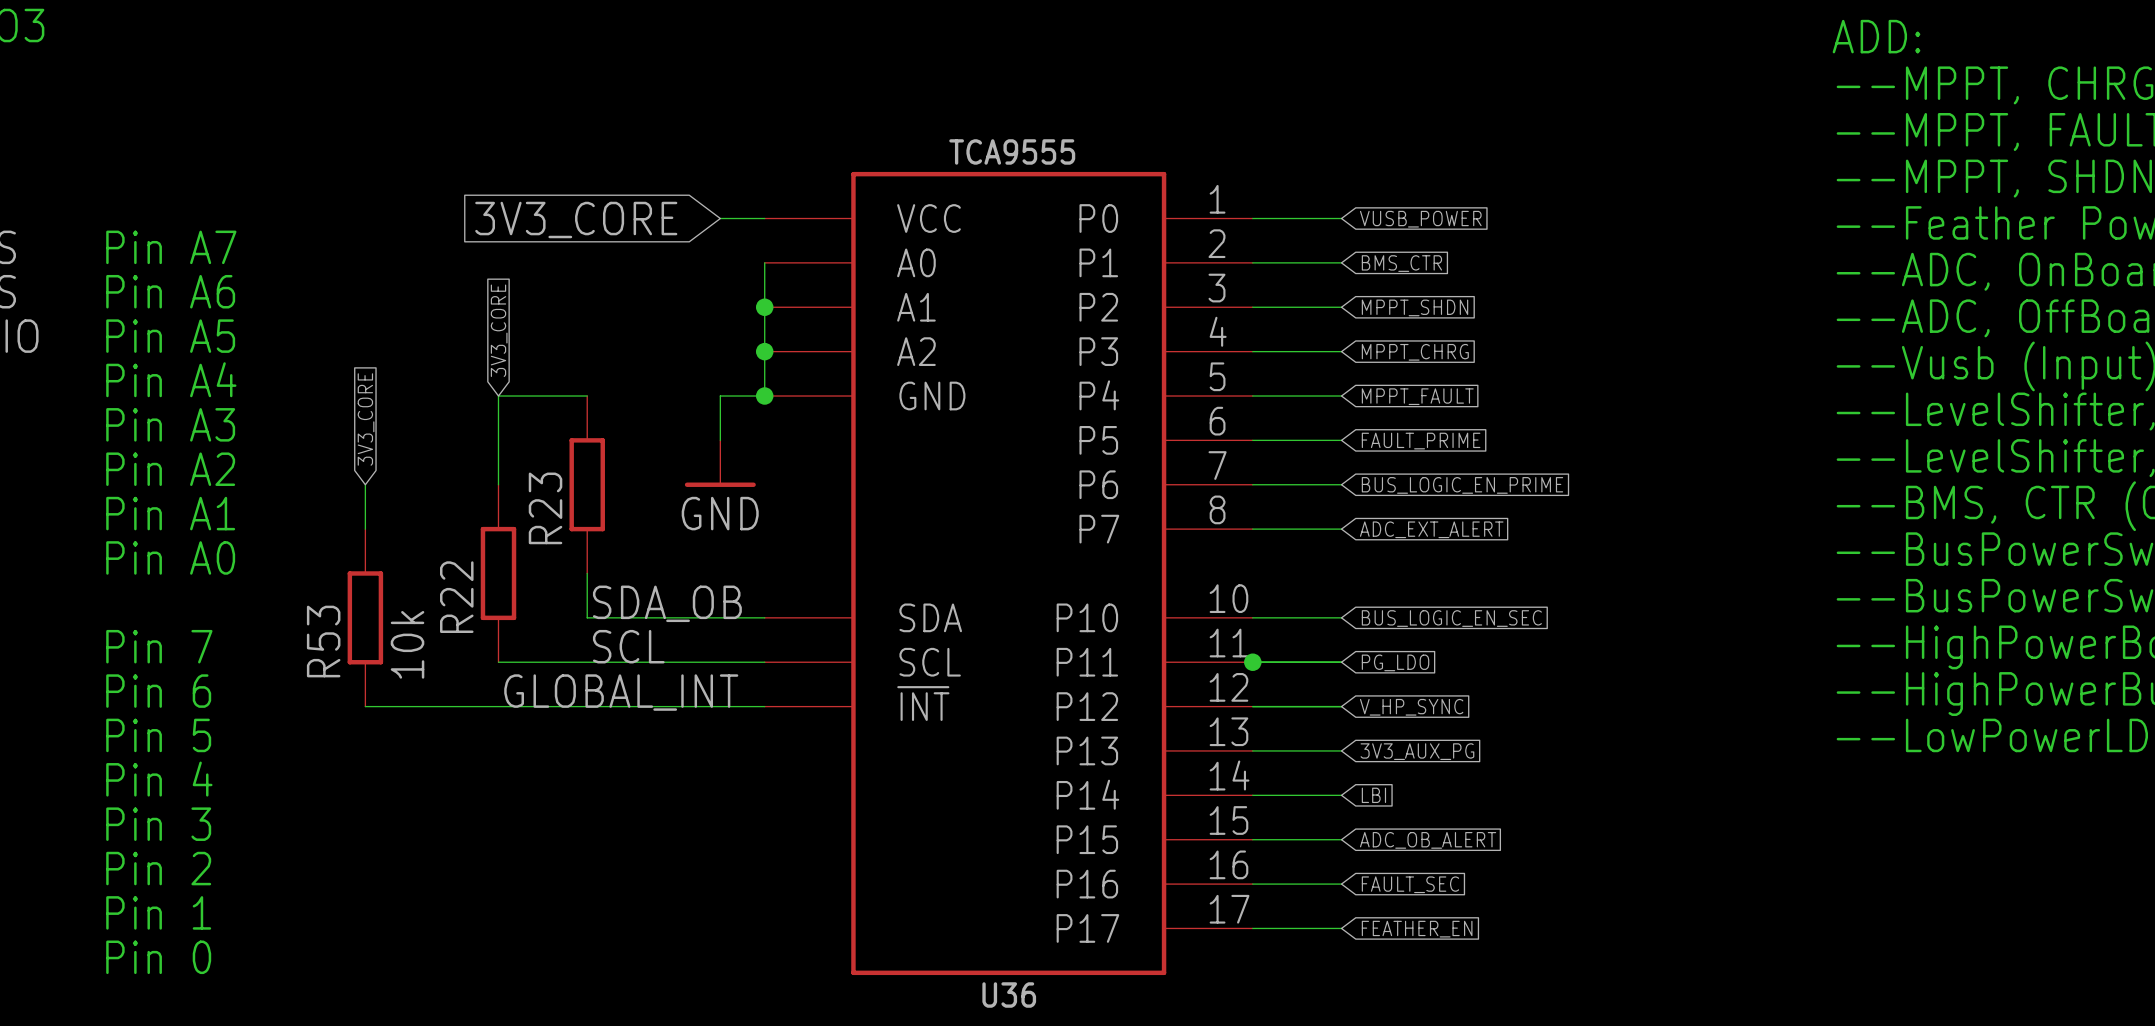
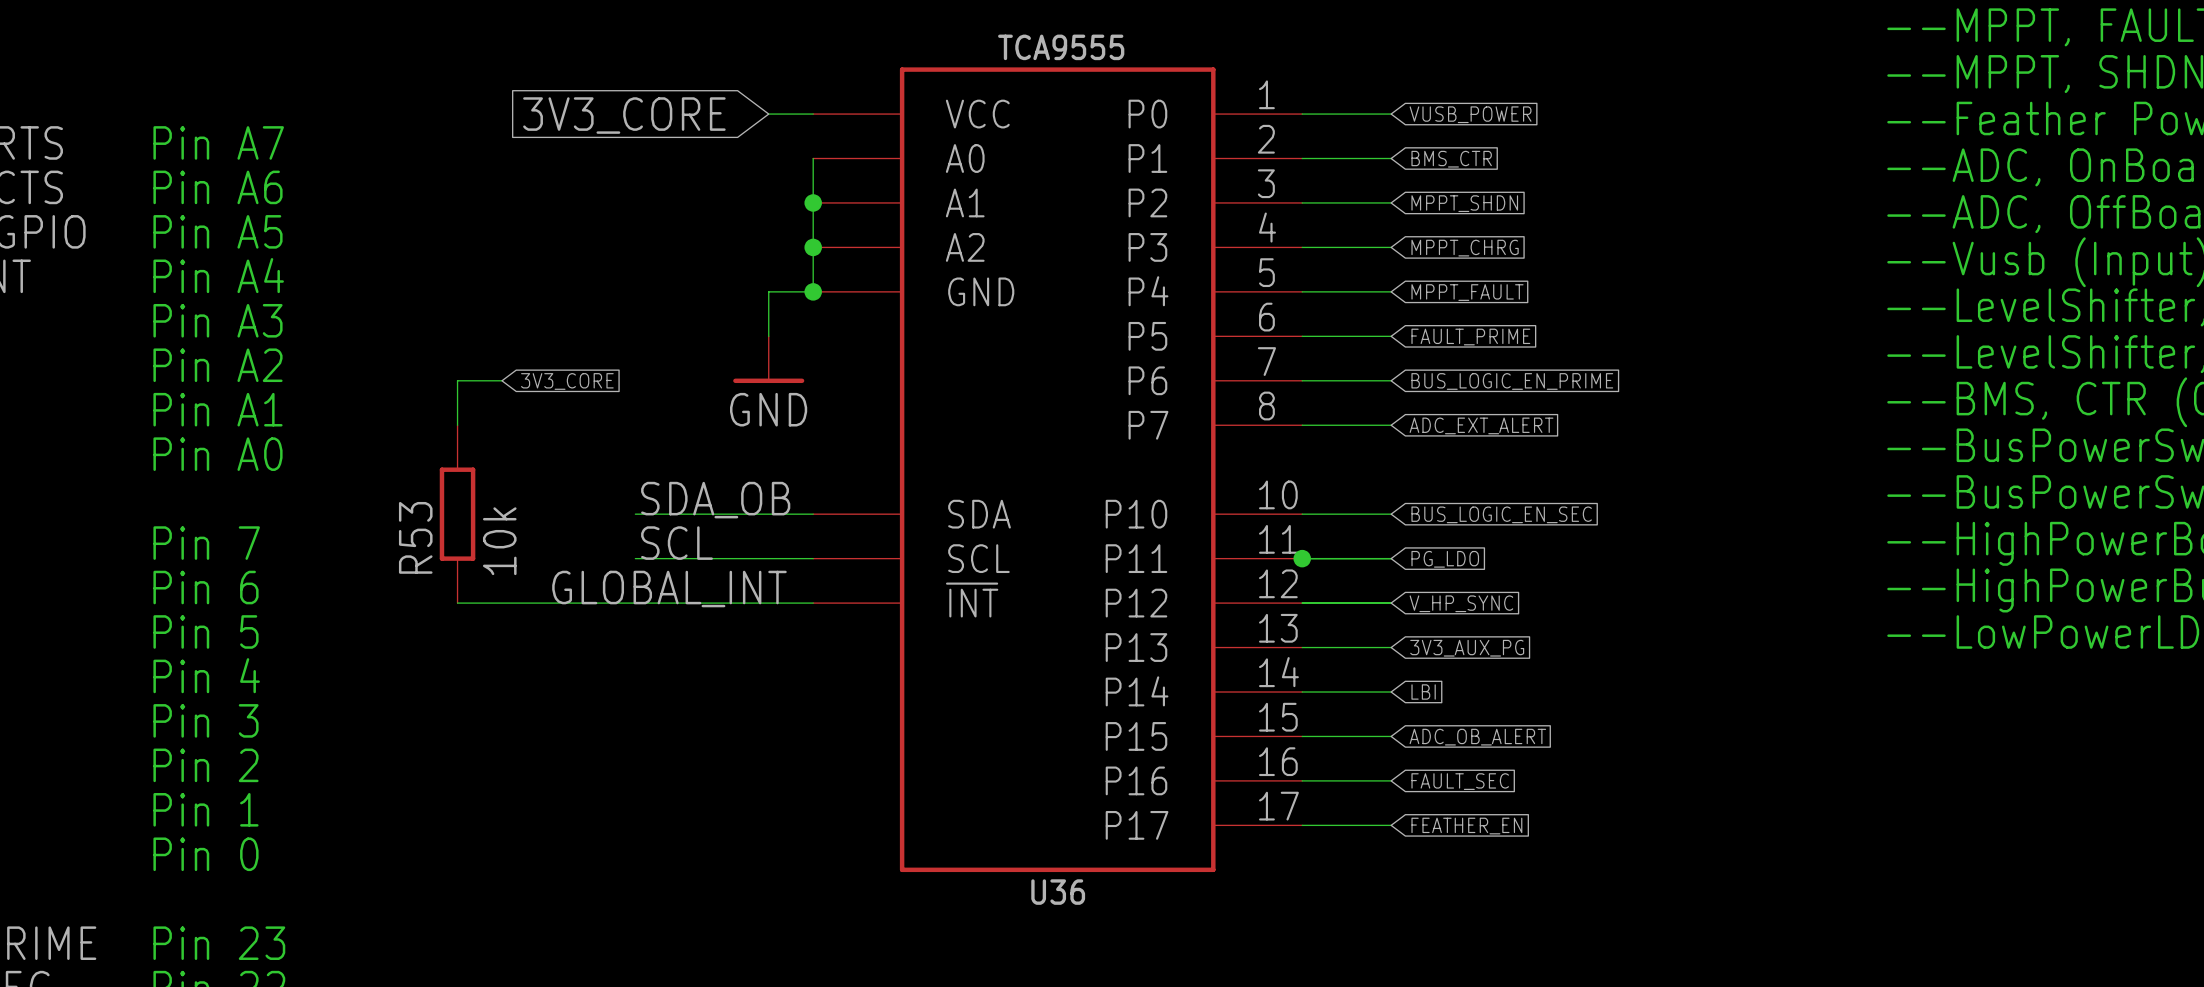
global label: 3V3_CORE (499, 330) -> none
wire: (587, 396) (498, 396) (498, 484) -> none
global label: 3V3_CORE (366, 419) -> none
wire: (365, 484) (365, 529) -> none
wire: none -> (501, 380) (457, 380) (457, 425)
R23: (587, 484) -> none
global label: none -> 3V3_CORE (567, 381)
R22: (498, 573) -> none
wire: (587, 573) (587, 617) -> none
R53 position: (365, 617) -> (457, 514)
wire: (498, 662) (587, 662) -> none
wire: (365, 706) (409, 706) -> none

